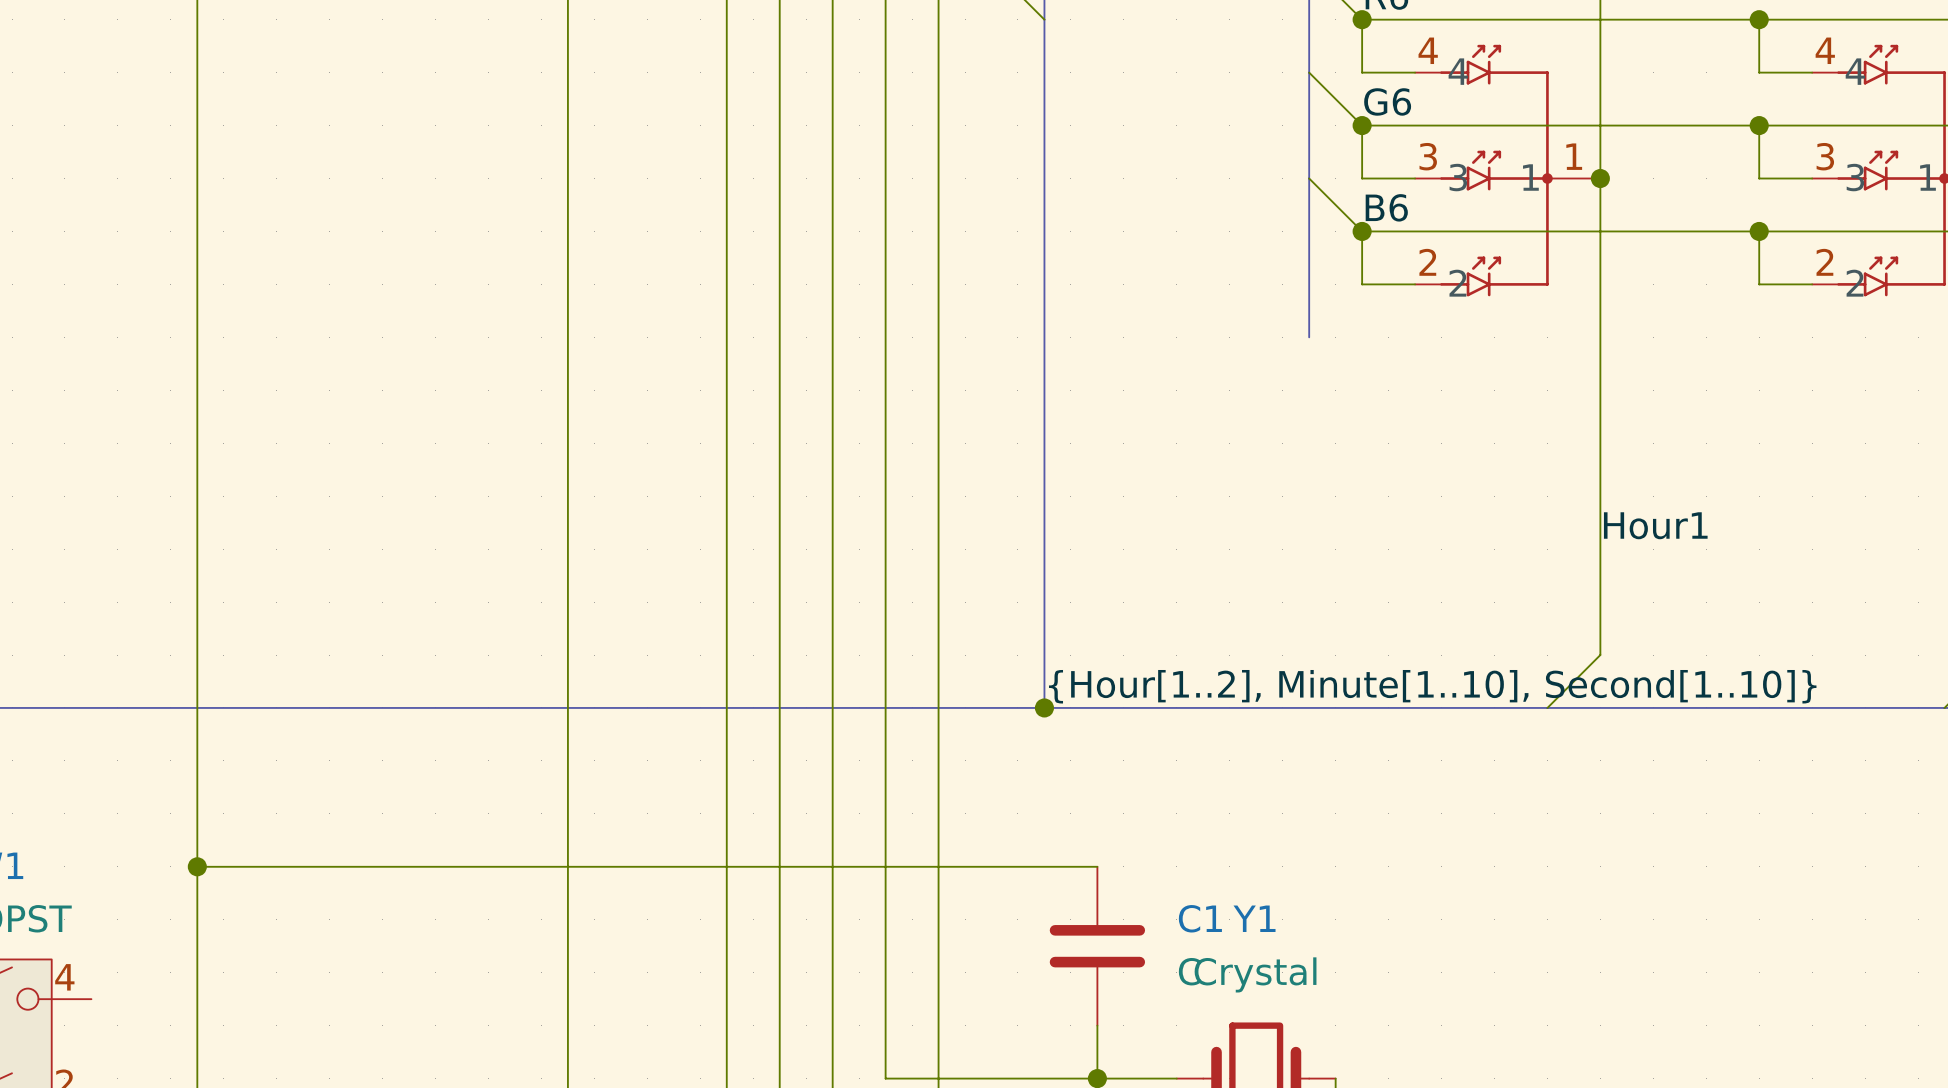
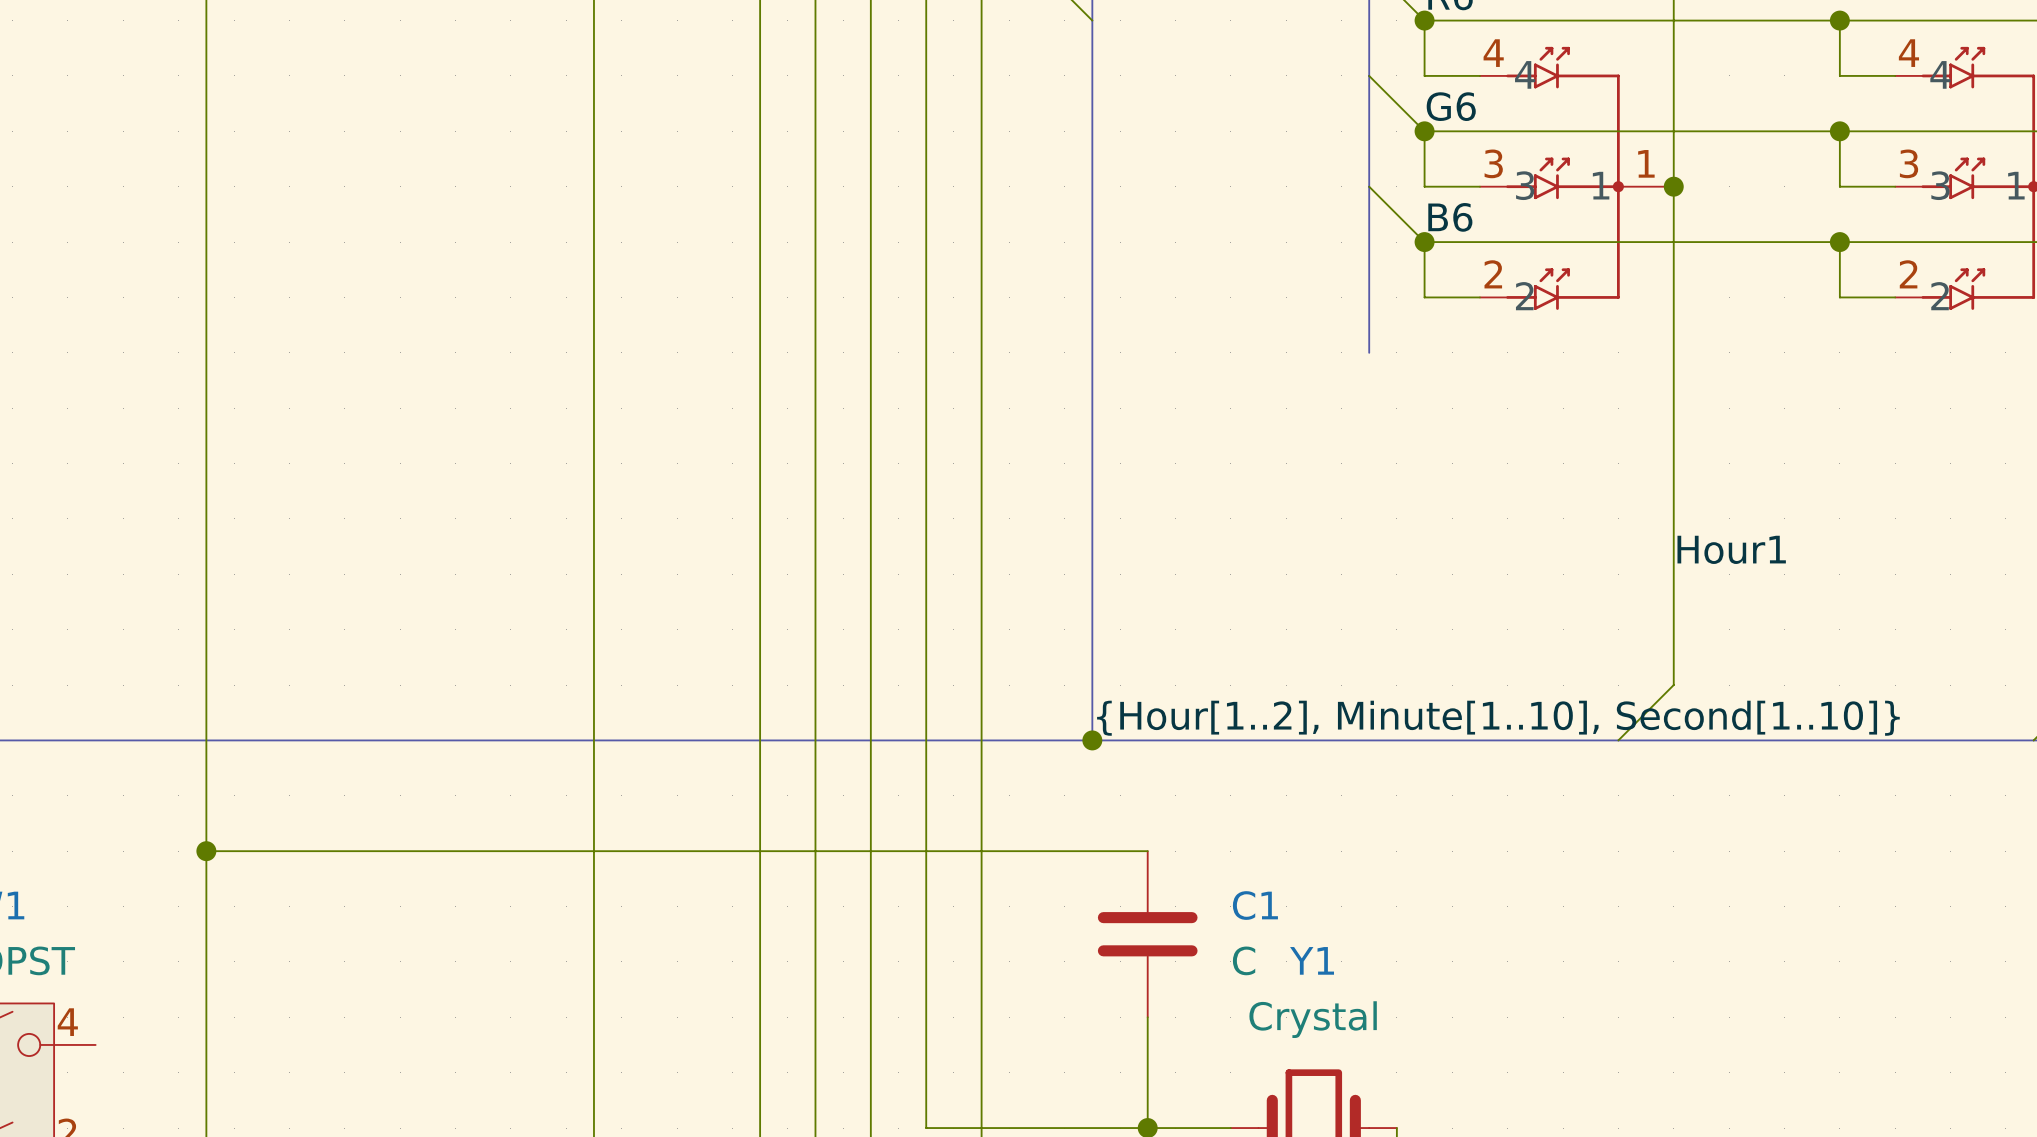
wire: (197, 866) (1097, 866) -> (206, 851) (1147, 851)
junction position: (197, 866) -> (206, 851)
C1 position: (1097, 946) -> (1147, 934)

